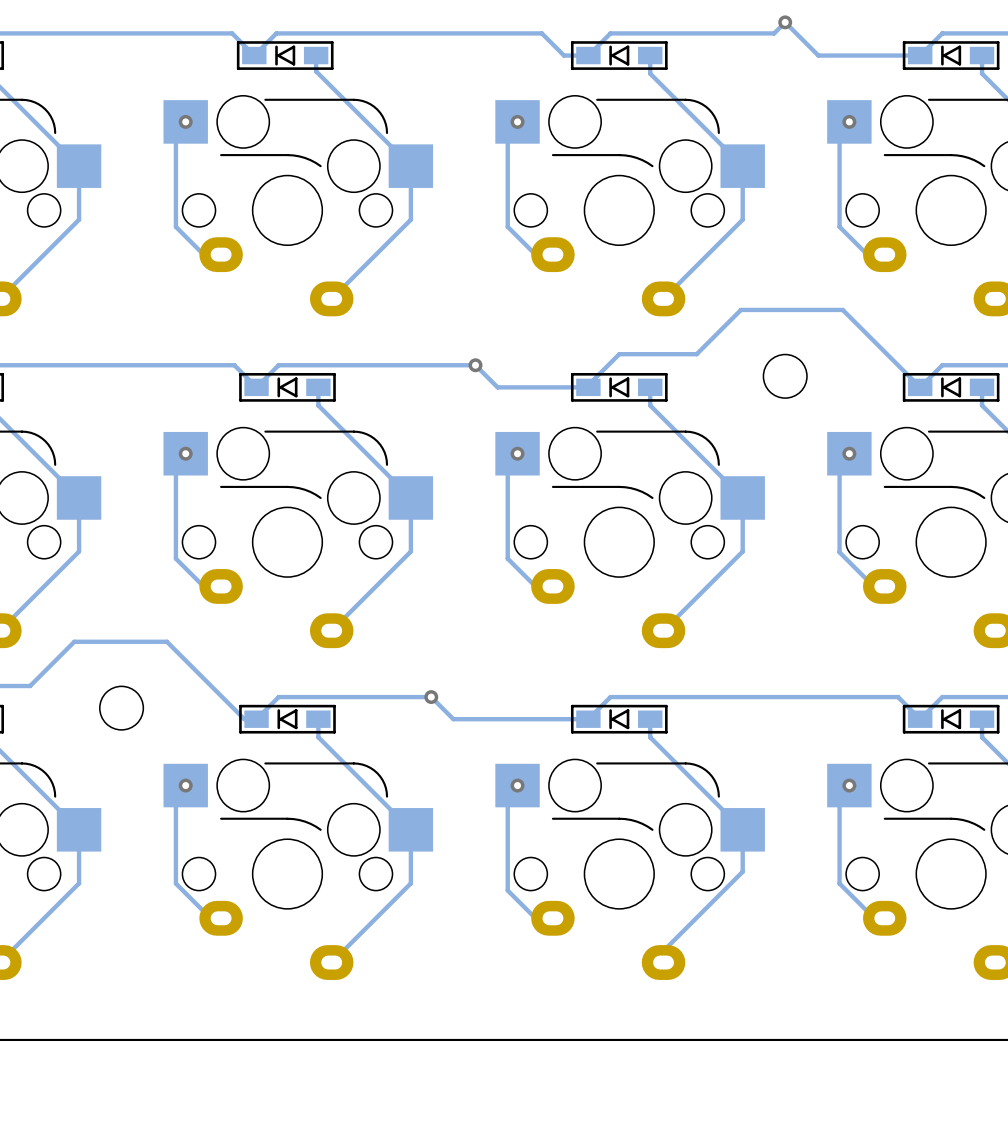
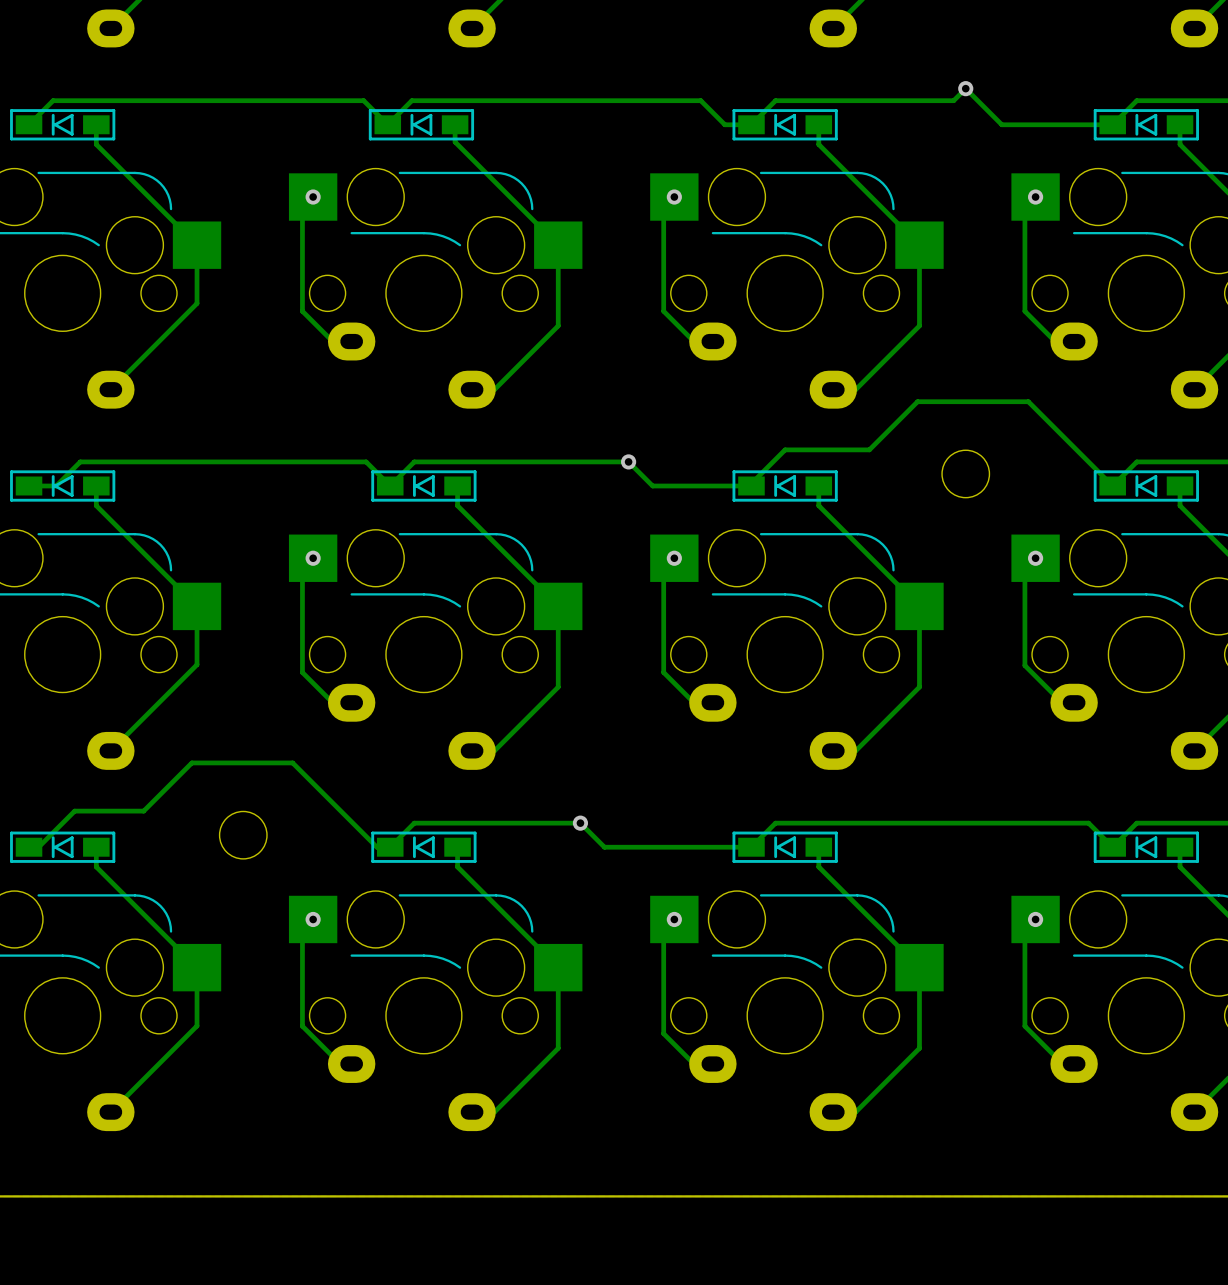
track: (410, 219) (331, 298) -> (558, 303) (558, 325) (494, 389) (472, 389)
track: (742, 219) (663, 298) -> (919, 303) (919, 325) (855, 389) (833, 389)
track: (410, 551) (331, 630) -> (558, 664) (558, 687) (494, 750) (472, 750)
track: (742, 551) (663, 630) -> (919, 664) (919, 687) (855, 750) (833, 750)
track: (742, 871) (663, 950) (663, 962) -> (919, 1013) (919, 1048) (855, 1112) (833, 1112)
track: (410, 883) (331, 962) -> (558, 1025) (558, 1048) (494, 1112) (472, 1112)

